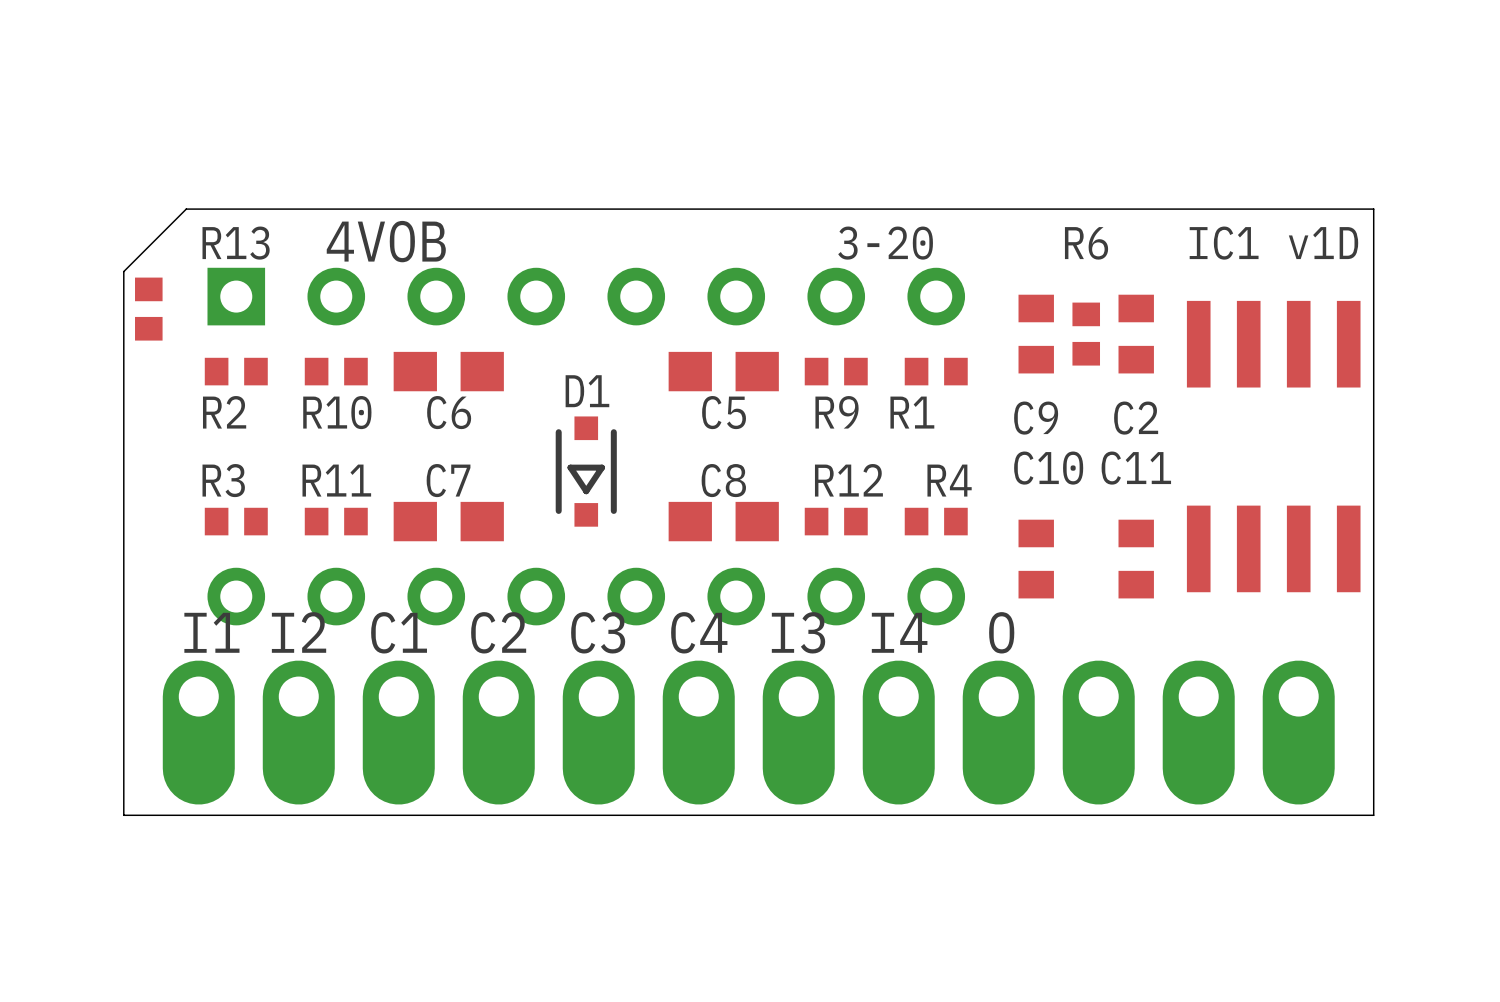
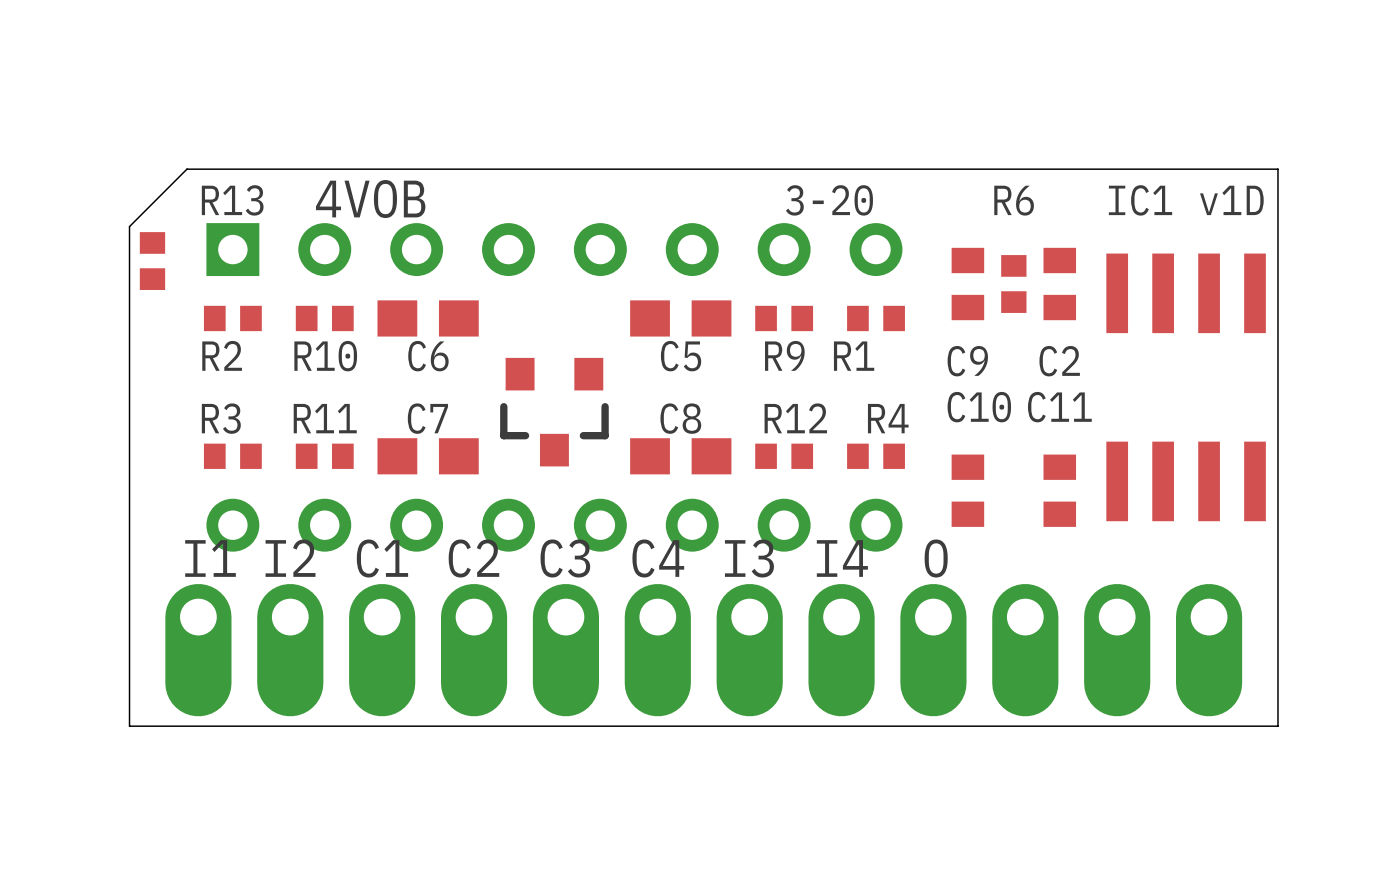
D1: (586, 471) -> none
part: none -> (554, 412)

